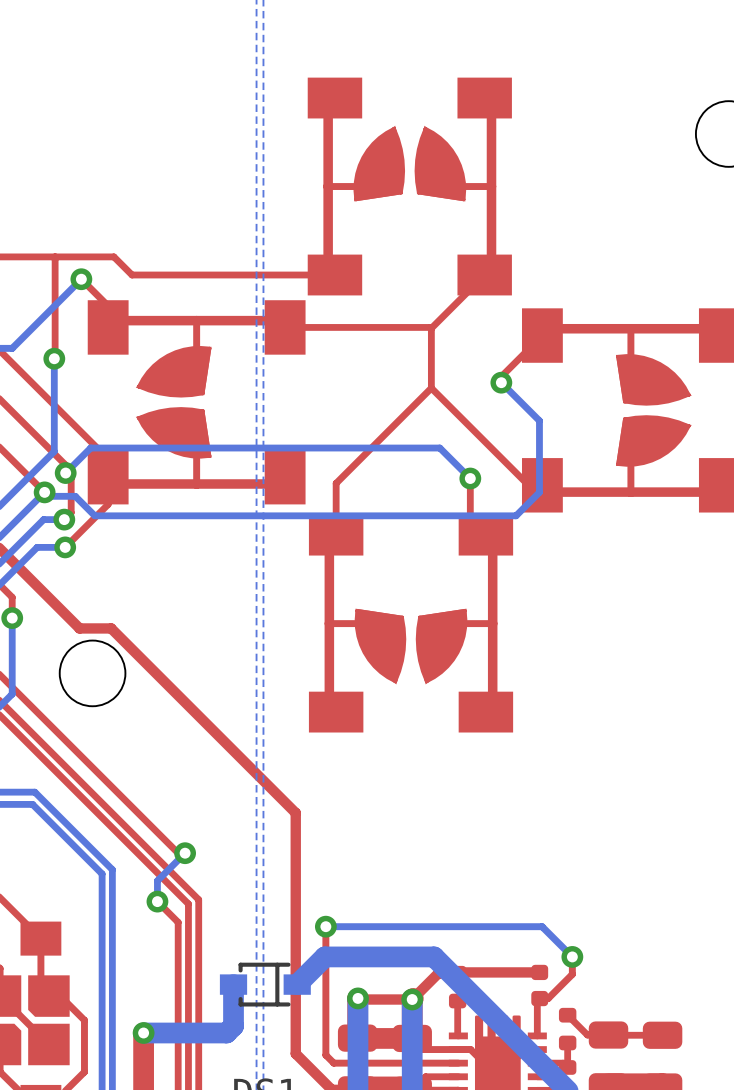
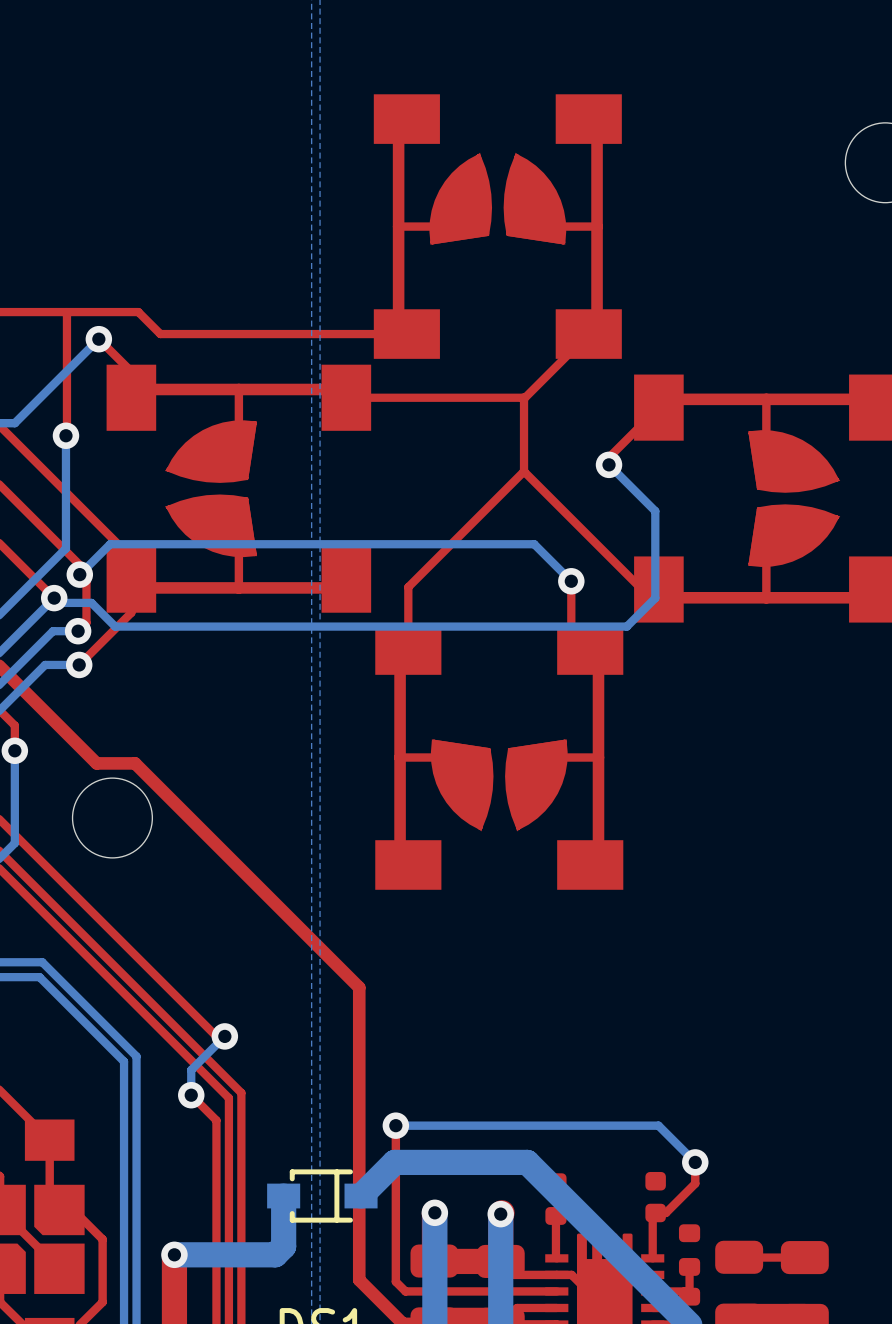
top track: (539, 972) (438, 973) (412, 999) (357, 998) -> none
top track: (567, 1015) (587, 1035) (608, 1035) -> none

